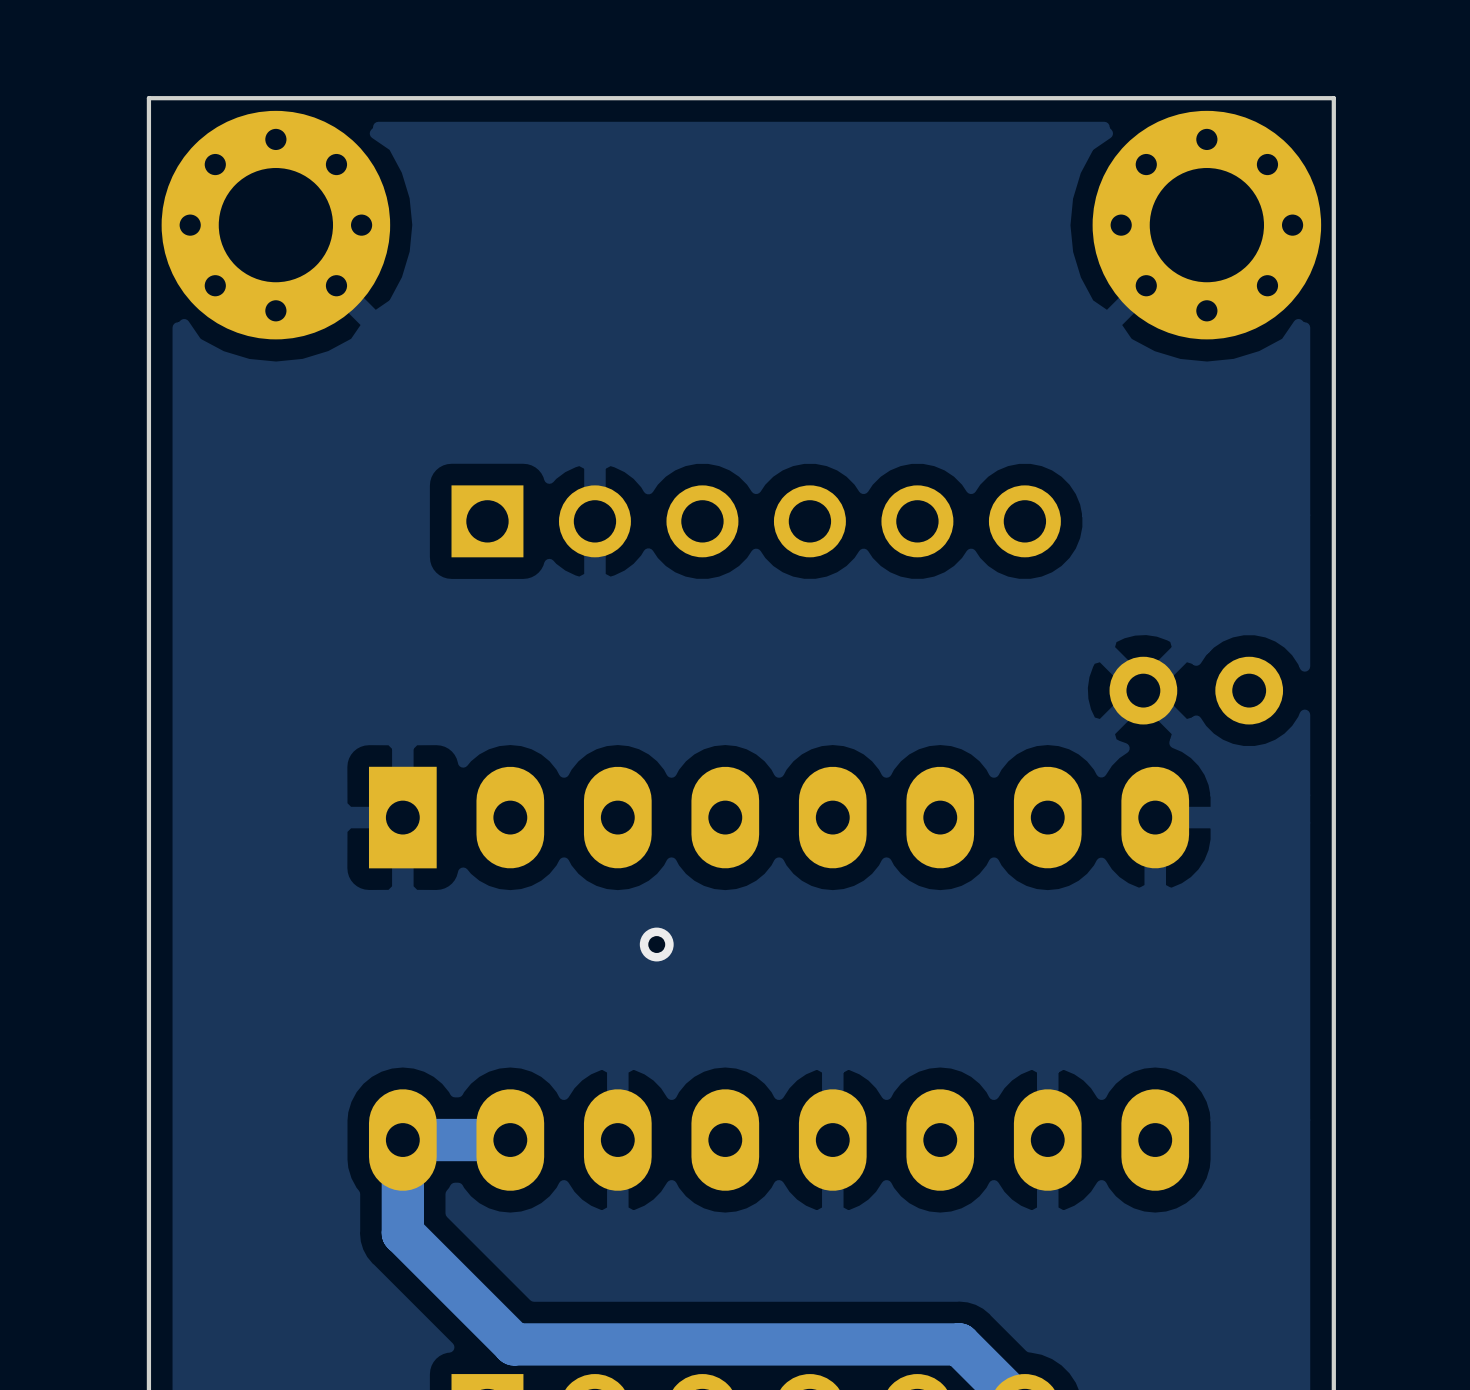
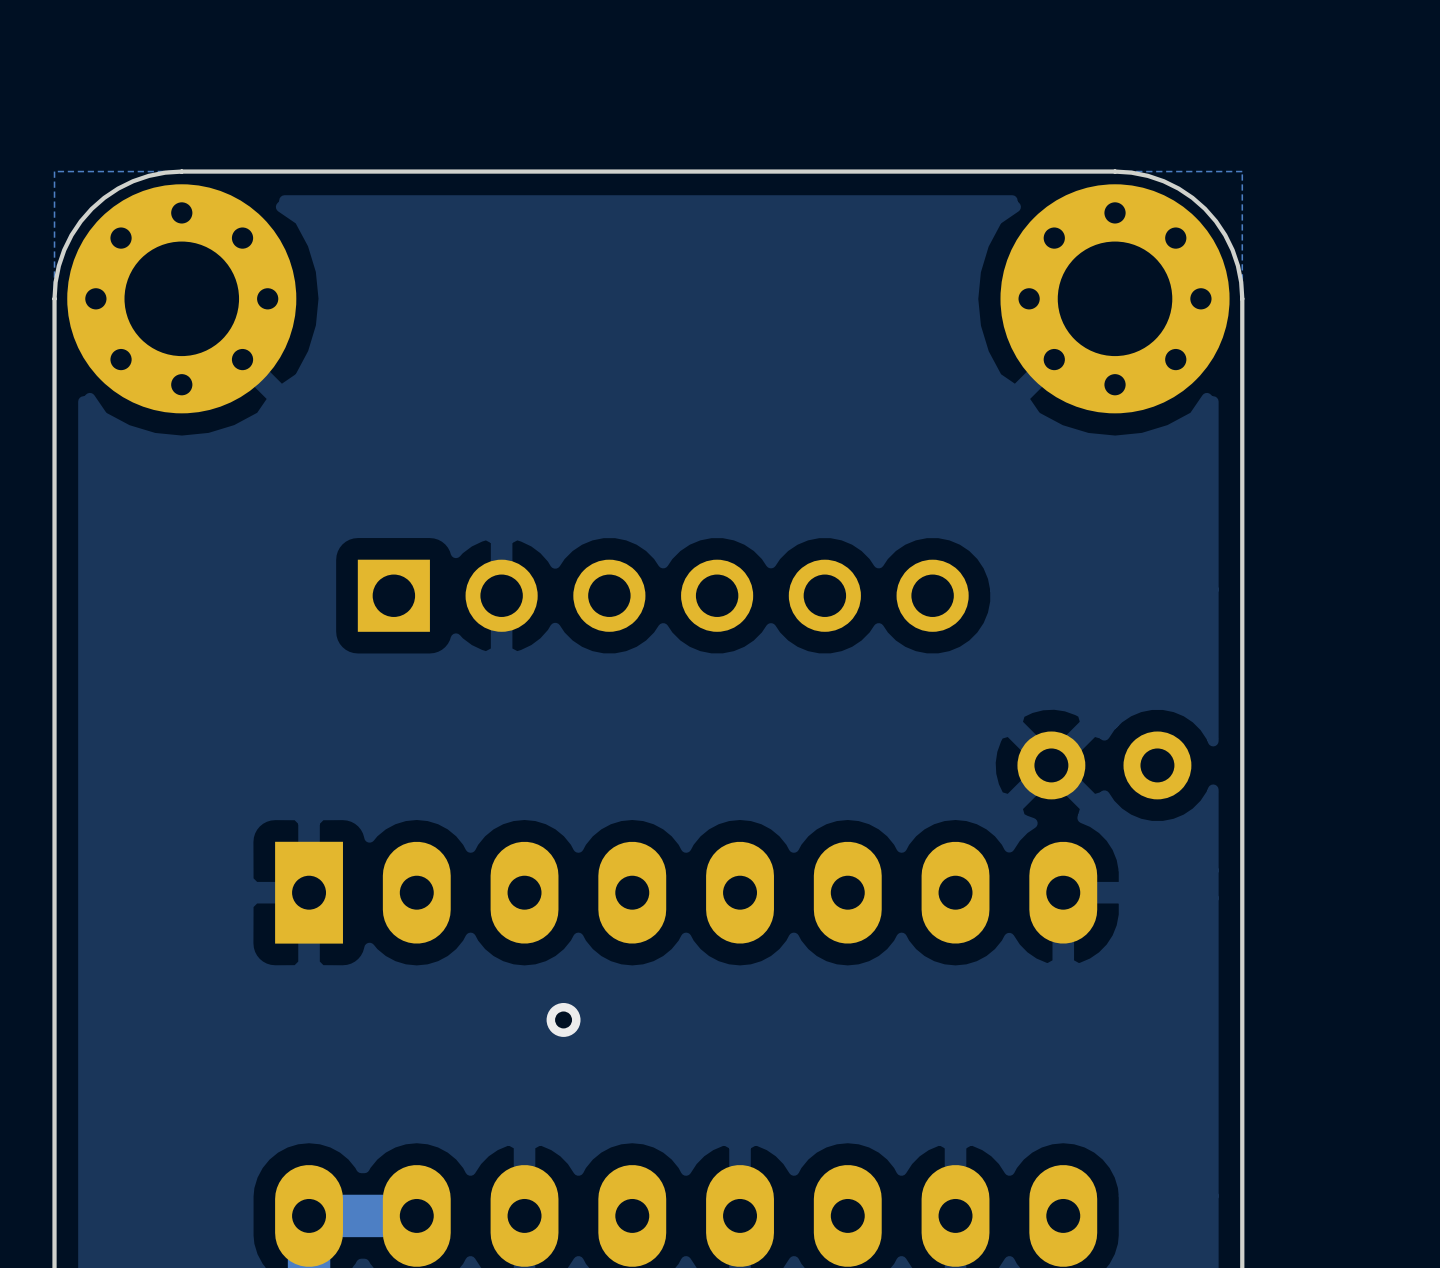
board edge: (275, 98) (148, 98) (148, 225) -> (181, 171) (148, 175) (133, 181) (118, 188) (91, 208) (80, 221) (64, 250) (58, 265) (54, 298)
board edge: (1206, 98) (1333, 98) (1333, 225) -> (1115, 171) (1147, 175) (1163, 181) (1192, 197) (1205, 208) (1215, 221) (1232, 250) (1237, 265) (1242, 298)

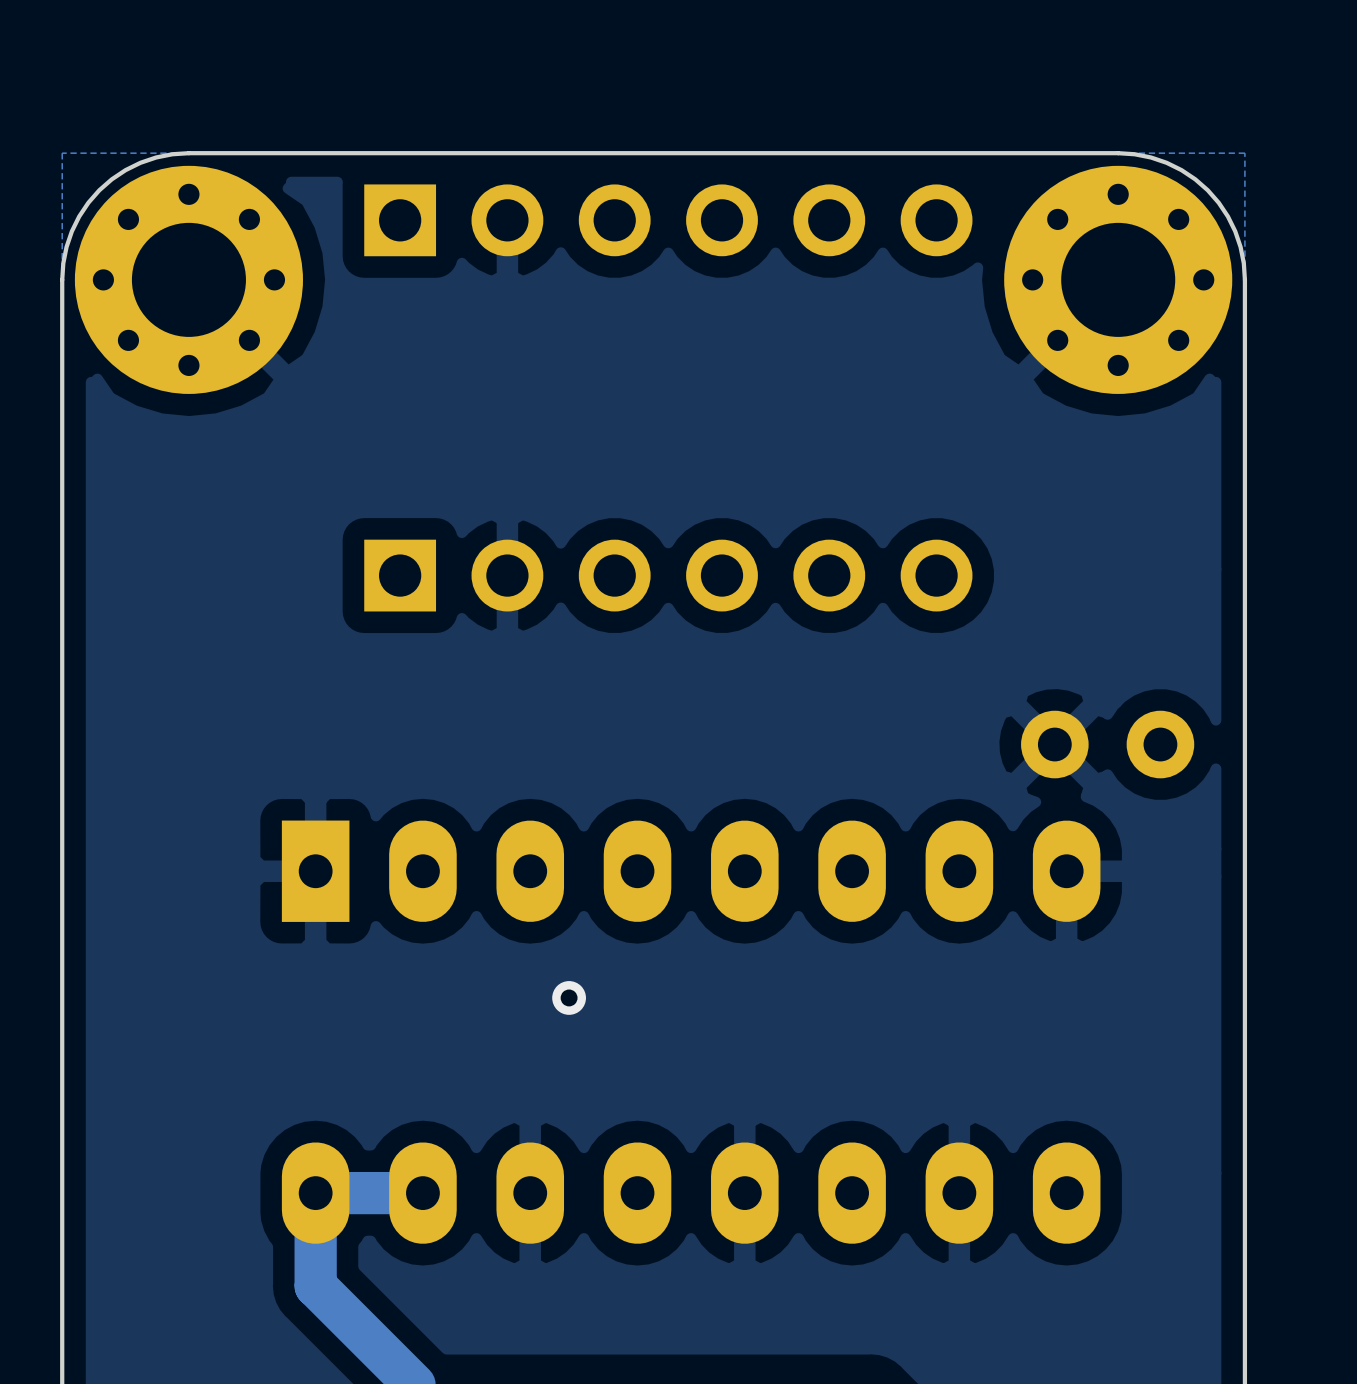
part: none -> (668, 220)

